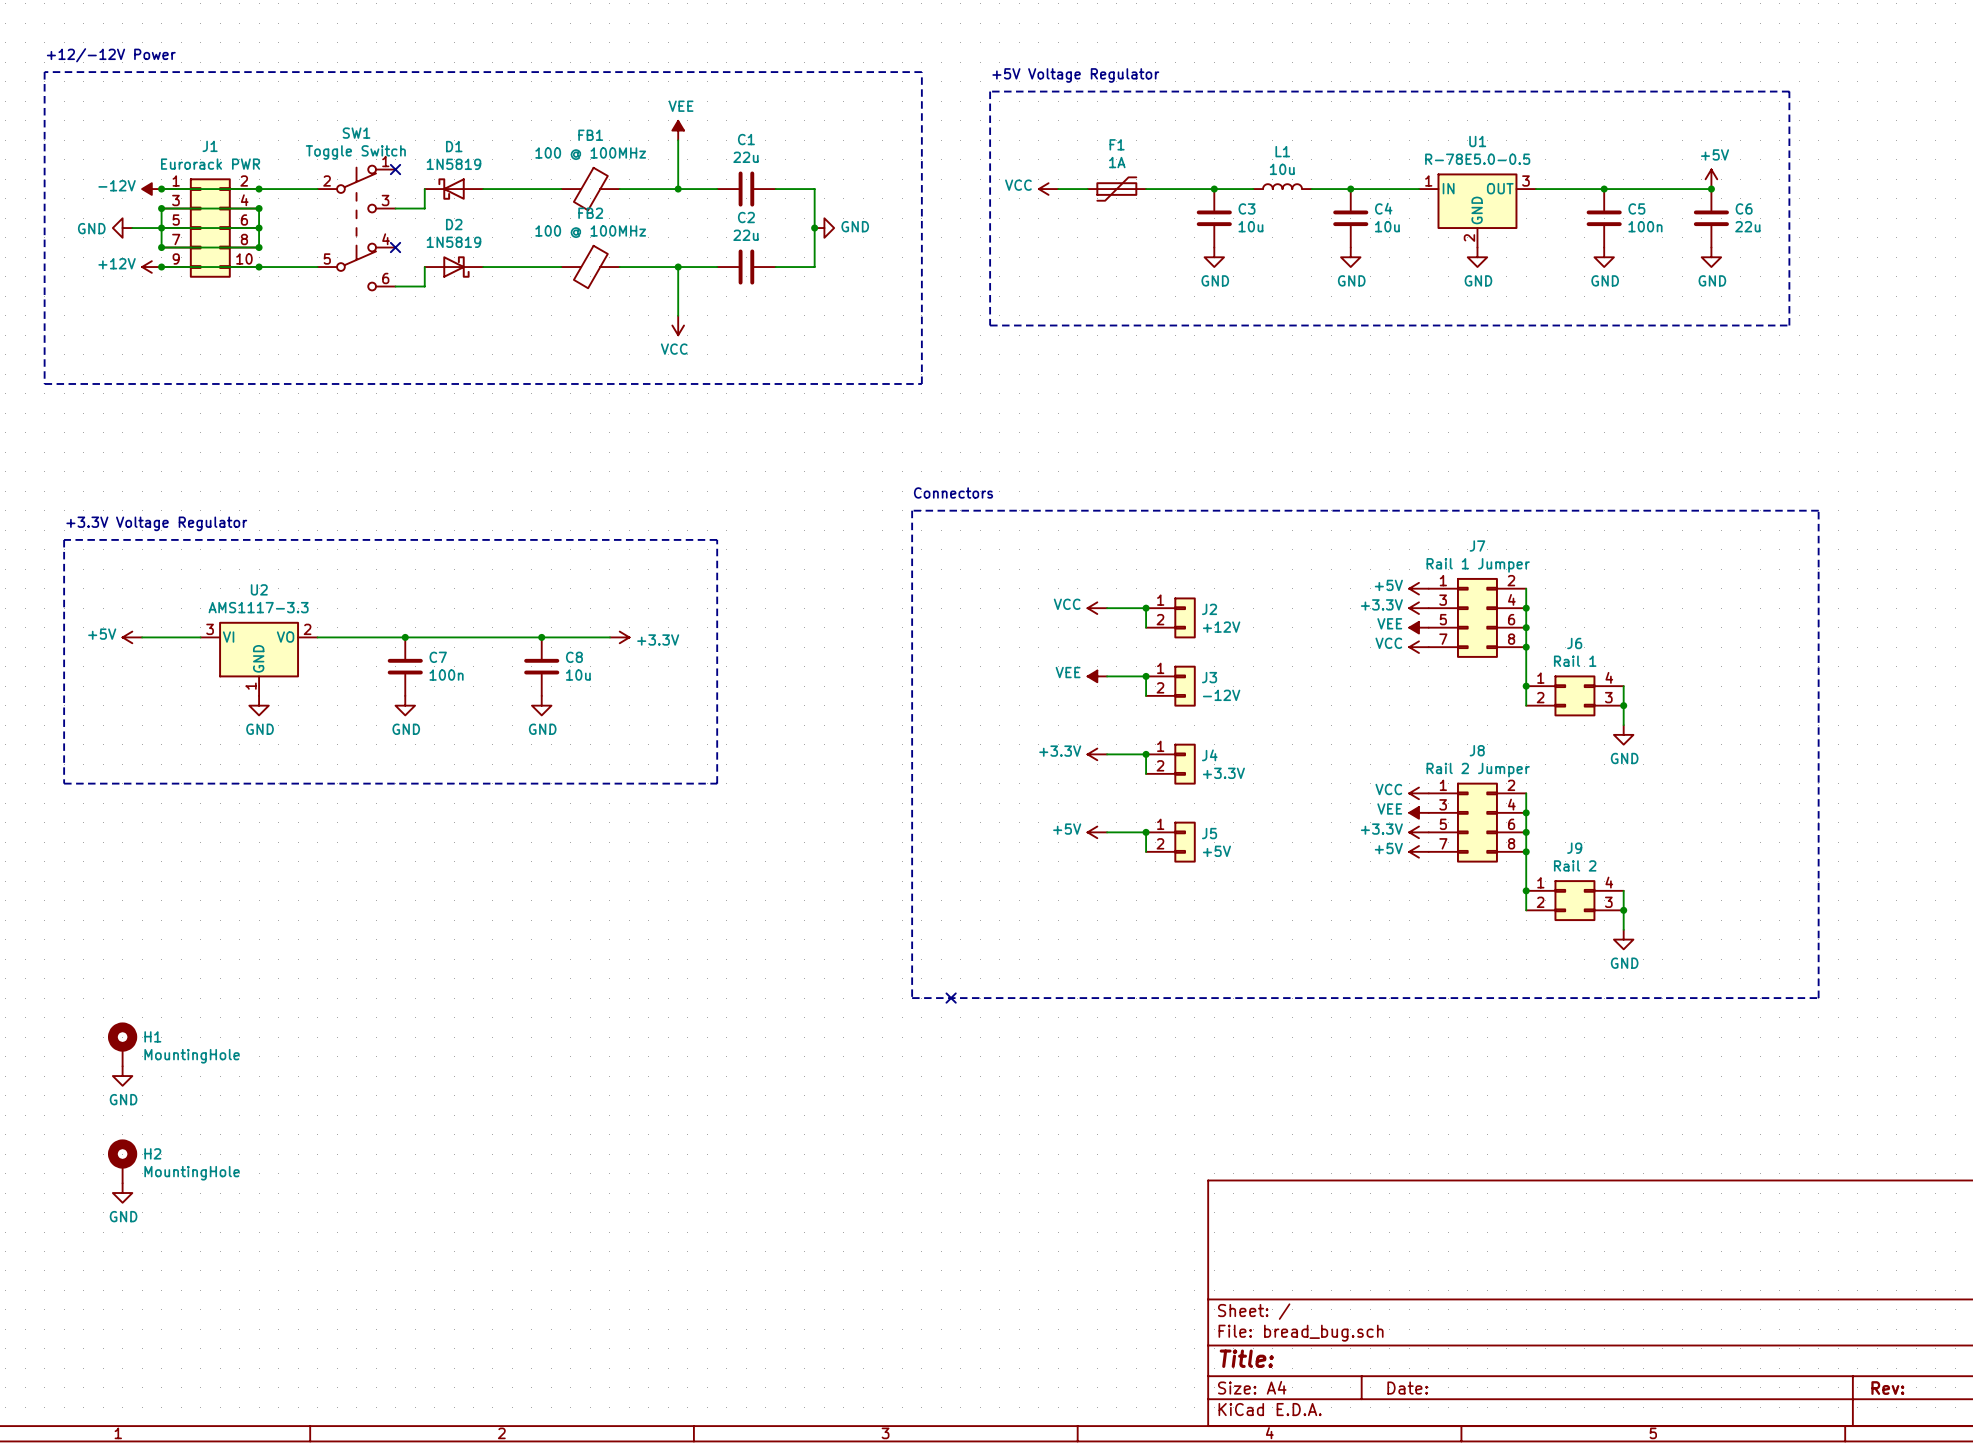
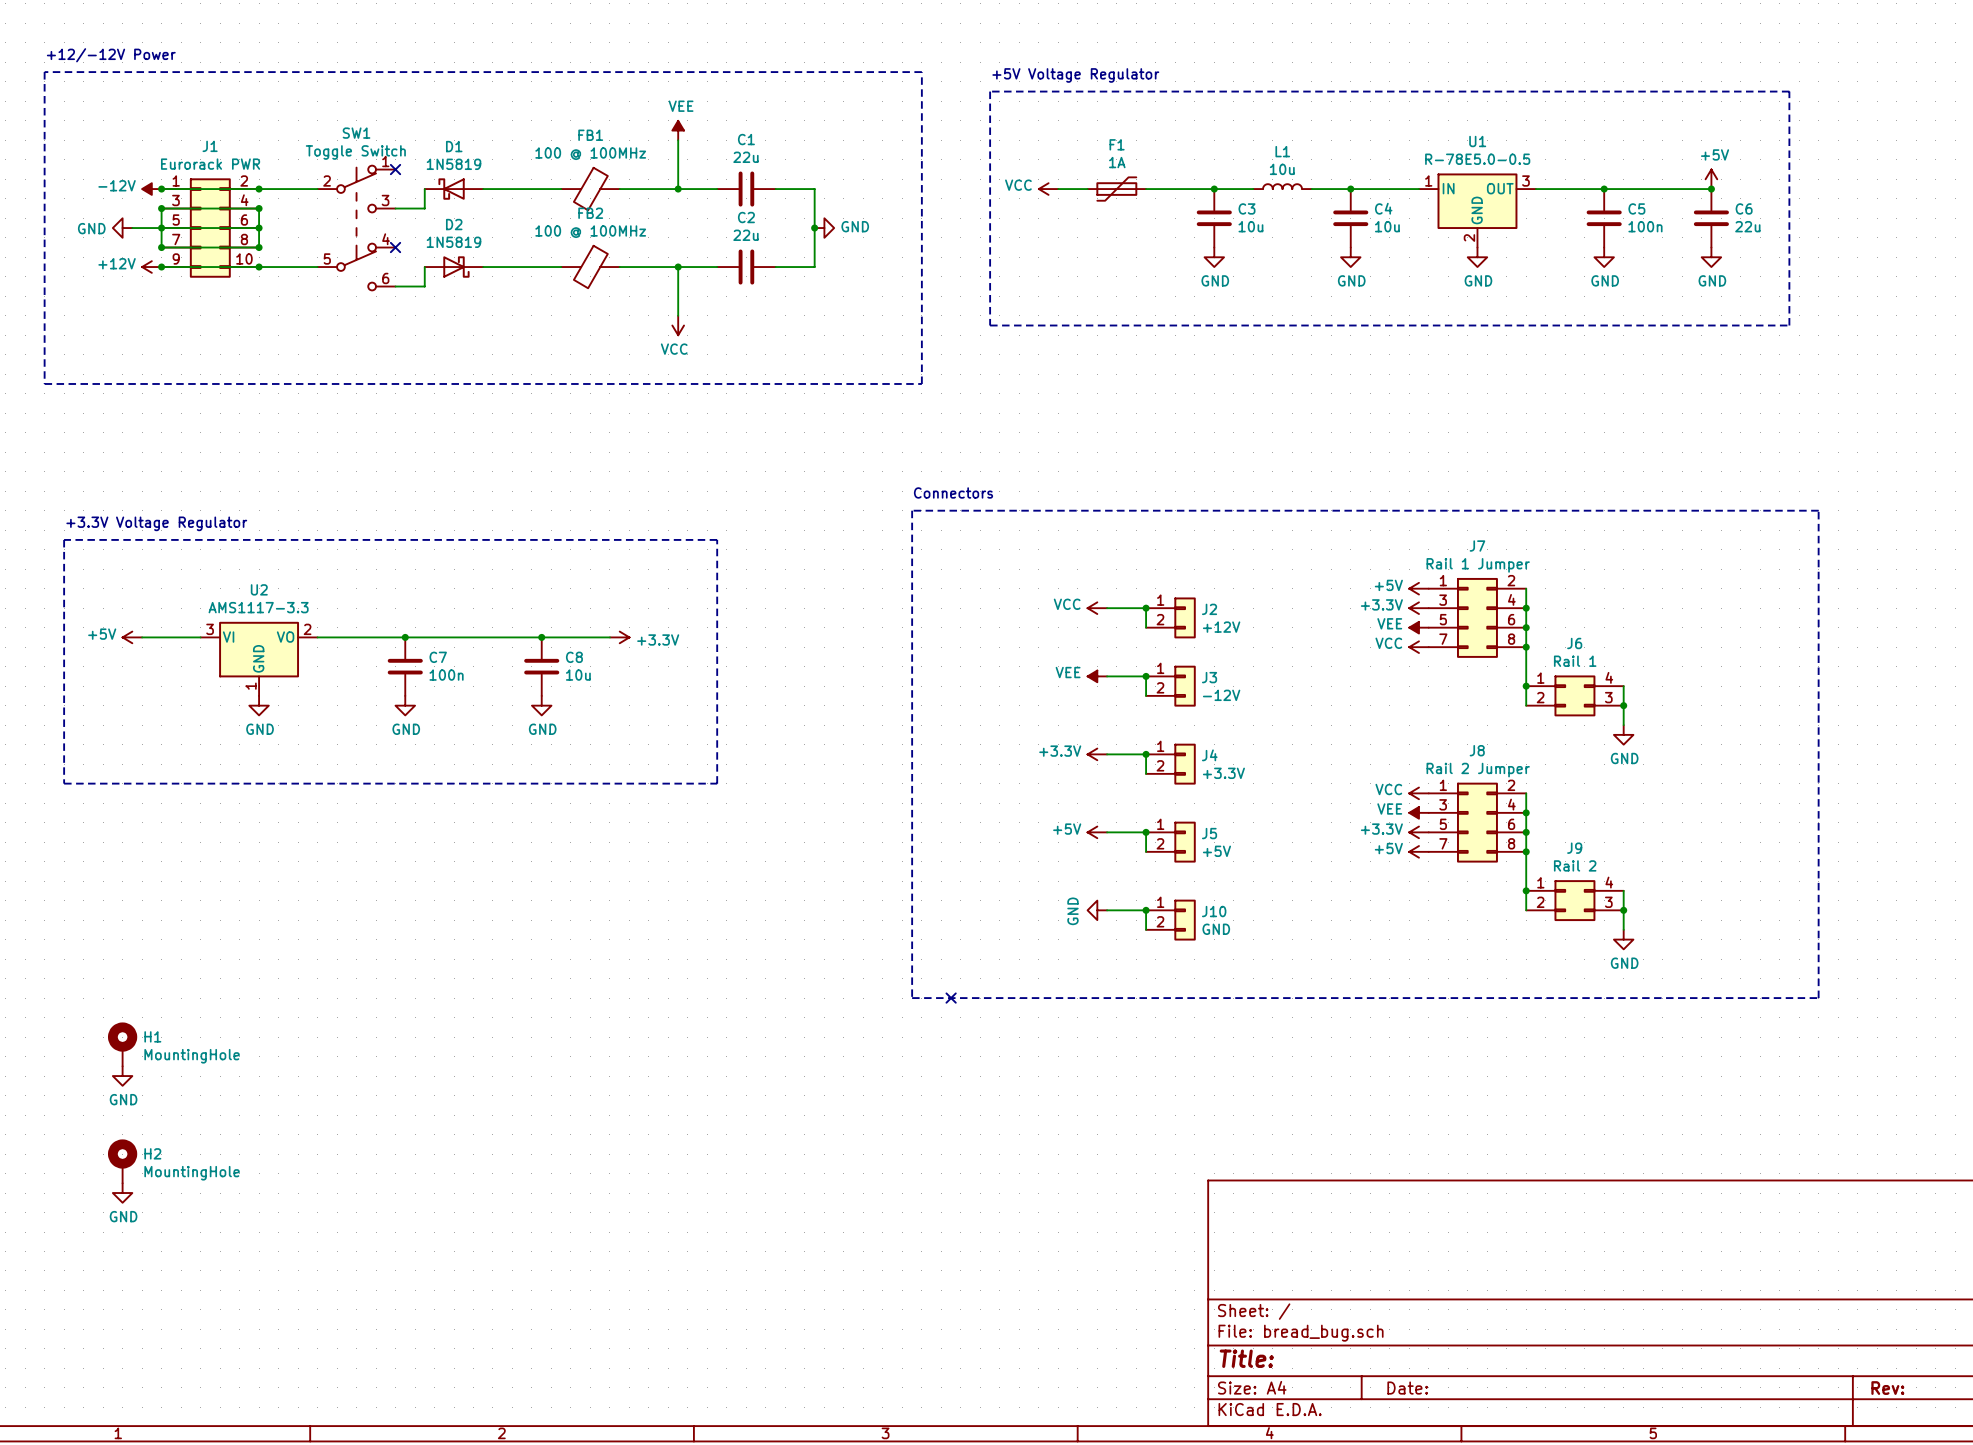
power symbol: none -> GND (1097, 910)
wire: none -> (1107, 910) (1146, 910) (1146, 929)
junction: none -> (1146, 910)
J10: none -> GND (1170, 920)

